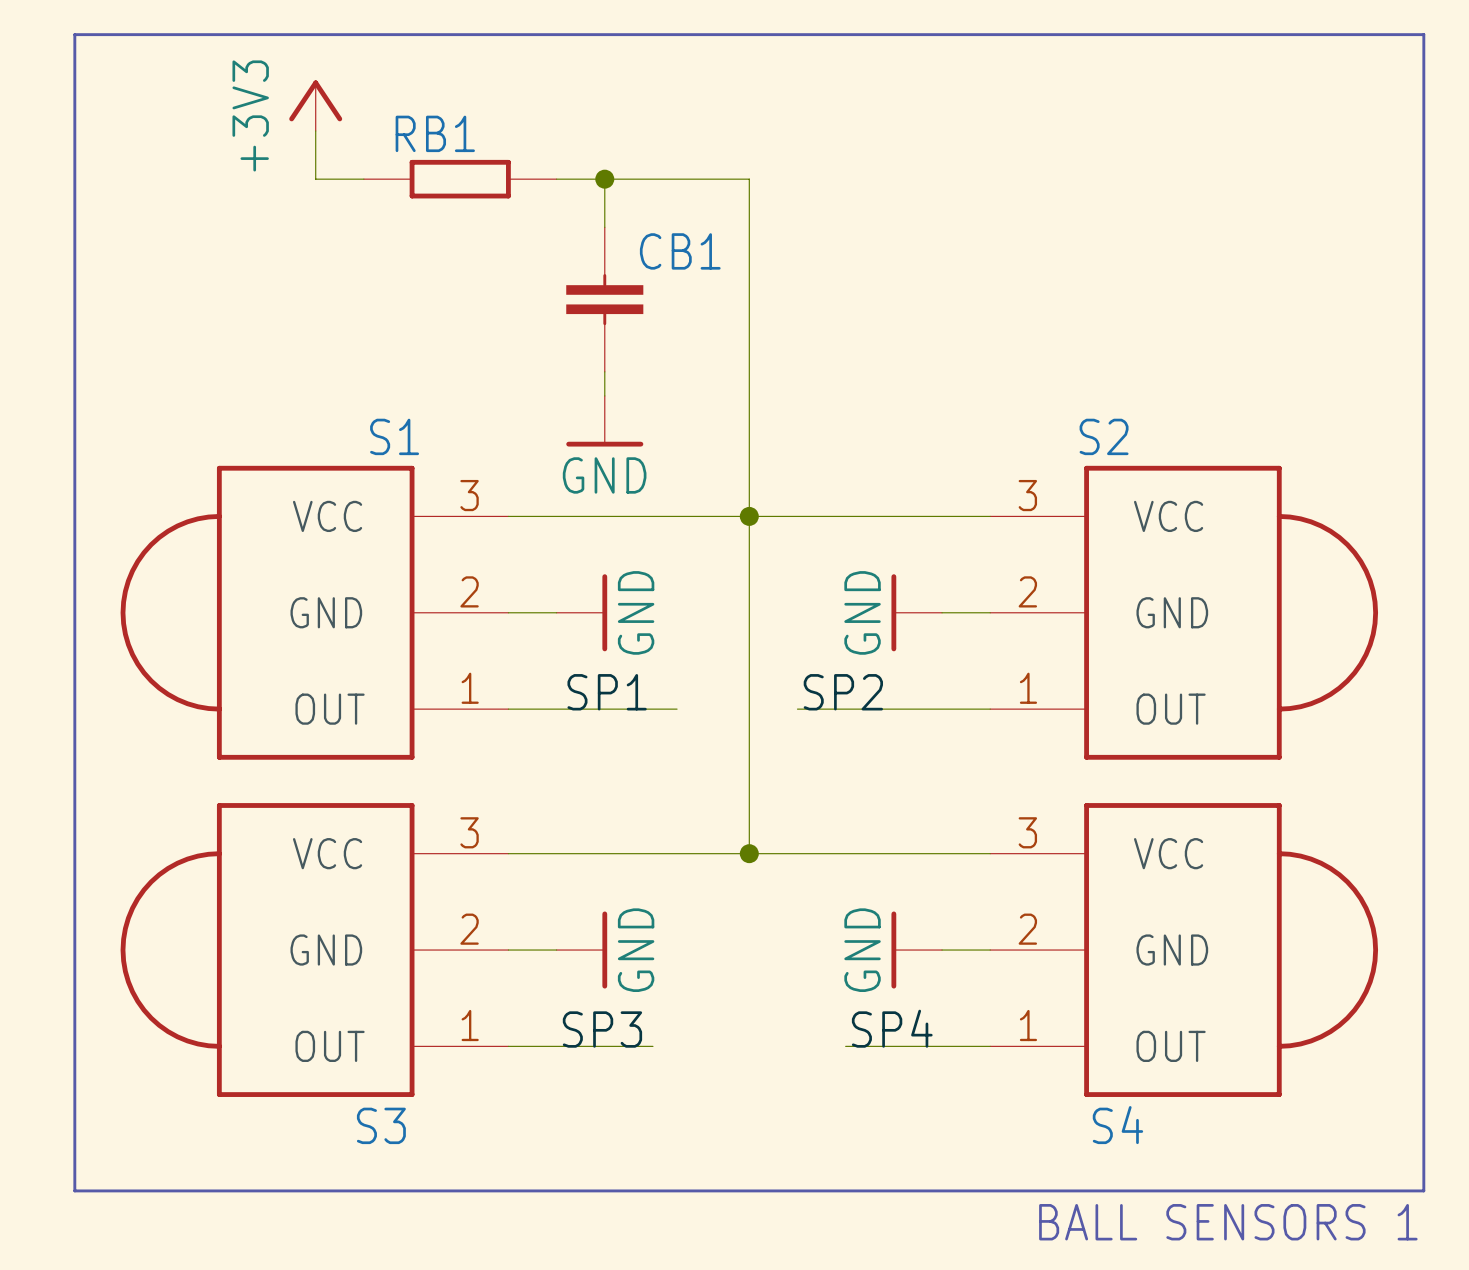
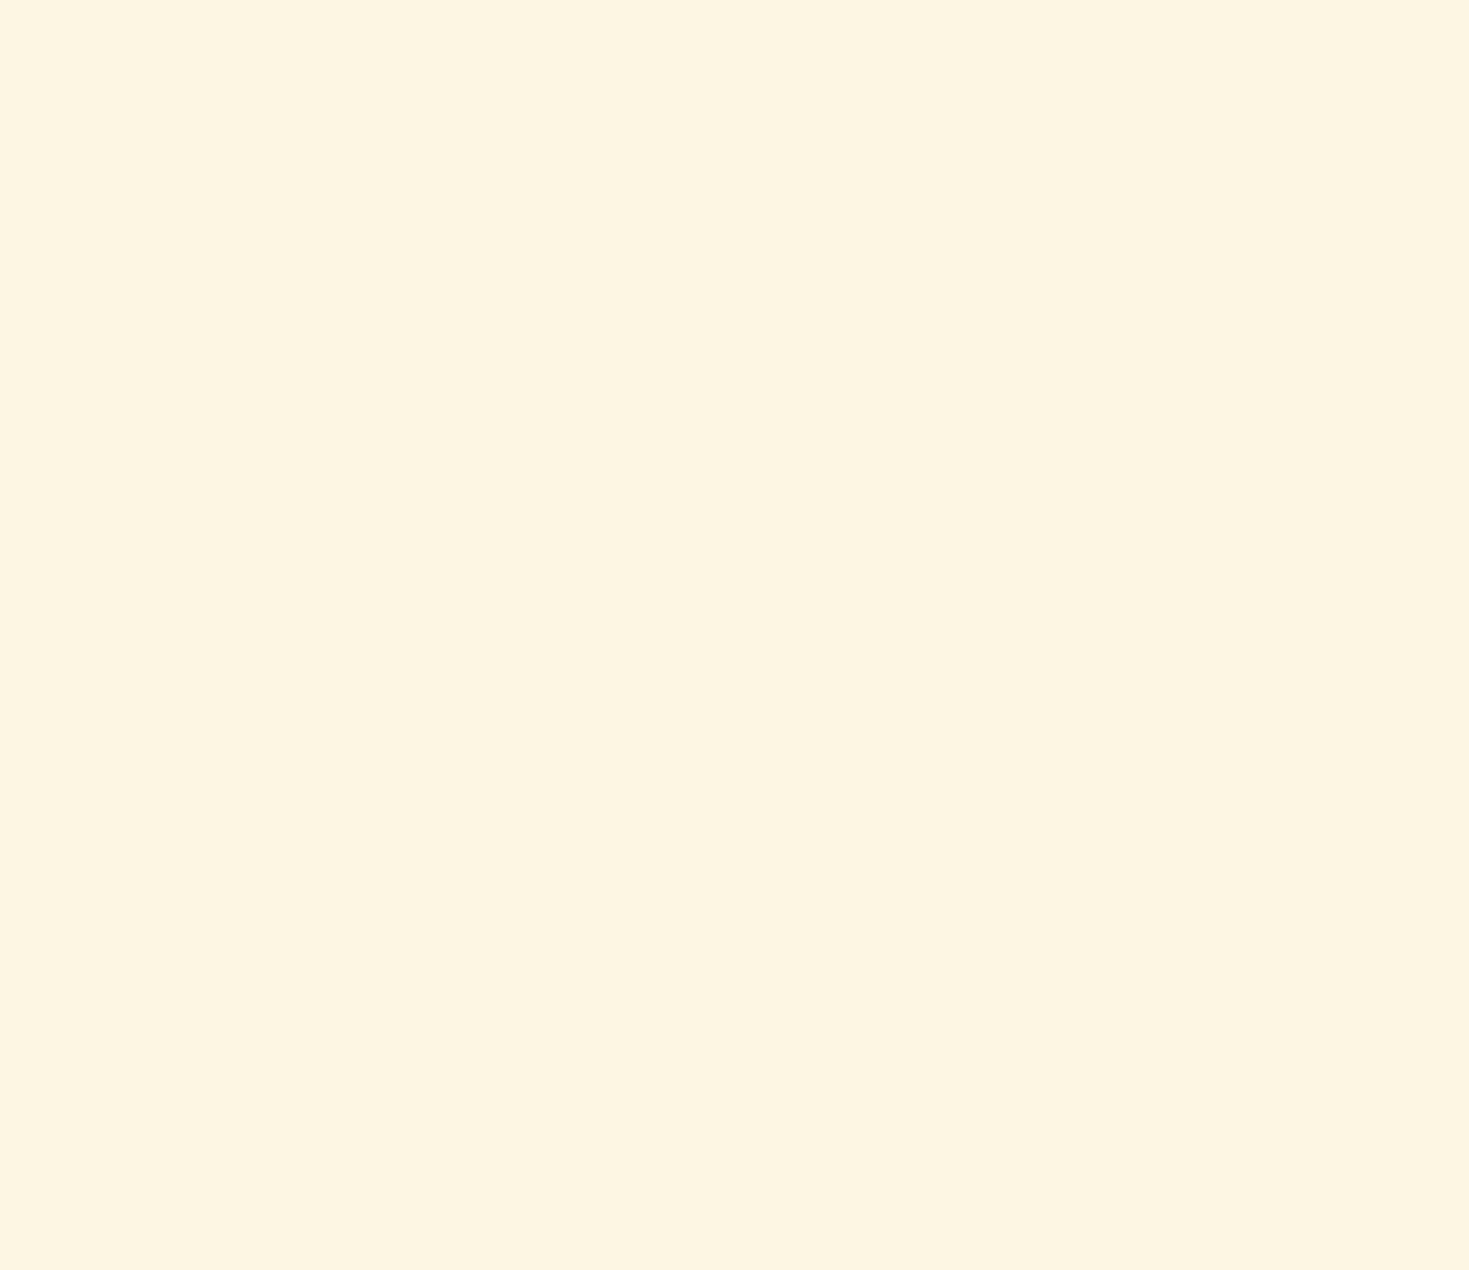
line: (74, 34) (74, 1190) (1423, 1190) (1423, 34) (74, 34) -> none
power symbol: +3V3 (315, 105) -> none
wire: (315, 130) (315, 179) (363, 179) -> none
RB1: (460, 179) -> none
wire: (556, 179) (749, 179) (749, 853) -> none
wire: (604, 179) (604, 227) -> none
junction: (604, 179) -> none
CB1: (604, 299) -> none
wire: (604, 371) (604, 395) -> none
power symbol: GND (604, 421) -> none
wire: (508, 516) (990, 516) -> none
junction: (749, 516) -> none
S1: (314, 612) -> none
wire: (508, 612) (556, 612) -> none
power symbol: GND (581, 612) -> none
power symbol: GND (916, 612) -> none
wire: (942, 612) (990, 612) -> none
S2: (1184, 612) -> none
label: SP1 (607, 692) -> none
label: SP2 (843, 692) -> none
wire: (508, 709) (677, 709) -> none
wire: (797, 709) (990, 709) -> none
wire: (508, 853) (990, 853) -> none
junction: (749, 853) -> none
S3: (314, 950) -> none
wire: (508, 950) (556, 950) -> none
power symbol: GND (581, 950) -> none
power symbol: GND (916, 950) -> none
wire: (942, 950) (990, 950) -> none
S4: (1184, 950) -> none
label: SP4 (892, 1028) -> none
label: SP3 (602, 1029) -> none
wire: (508, 1046) (652, 1046) -> none
wire: (845, 1046) (990, 1046) -> none
text: BALL SENSORS 1 (1228, 1222) -> none

